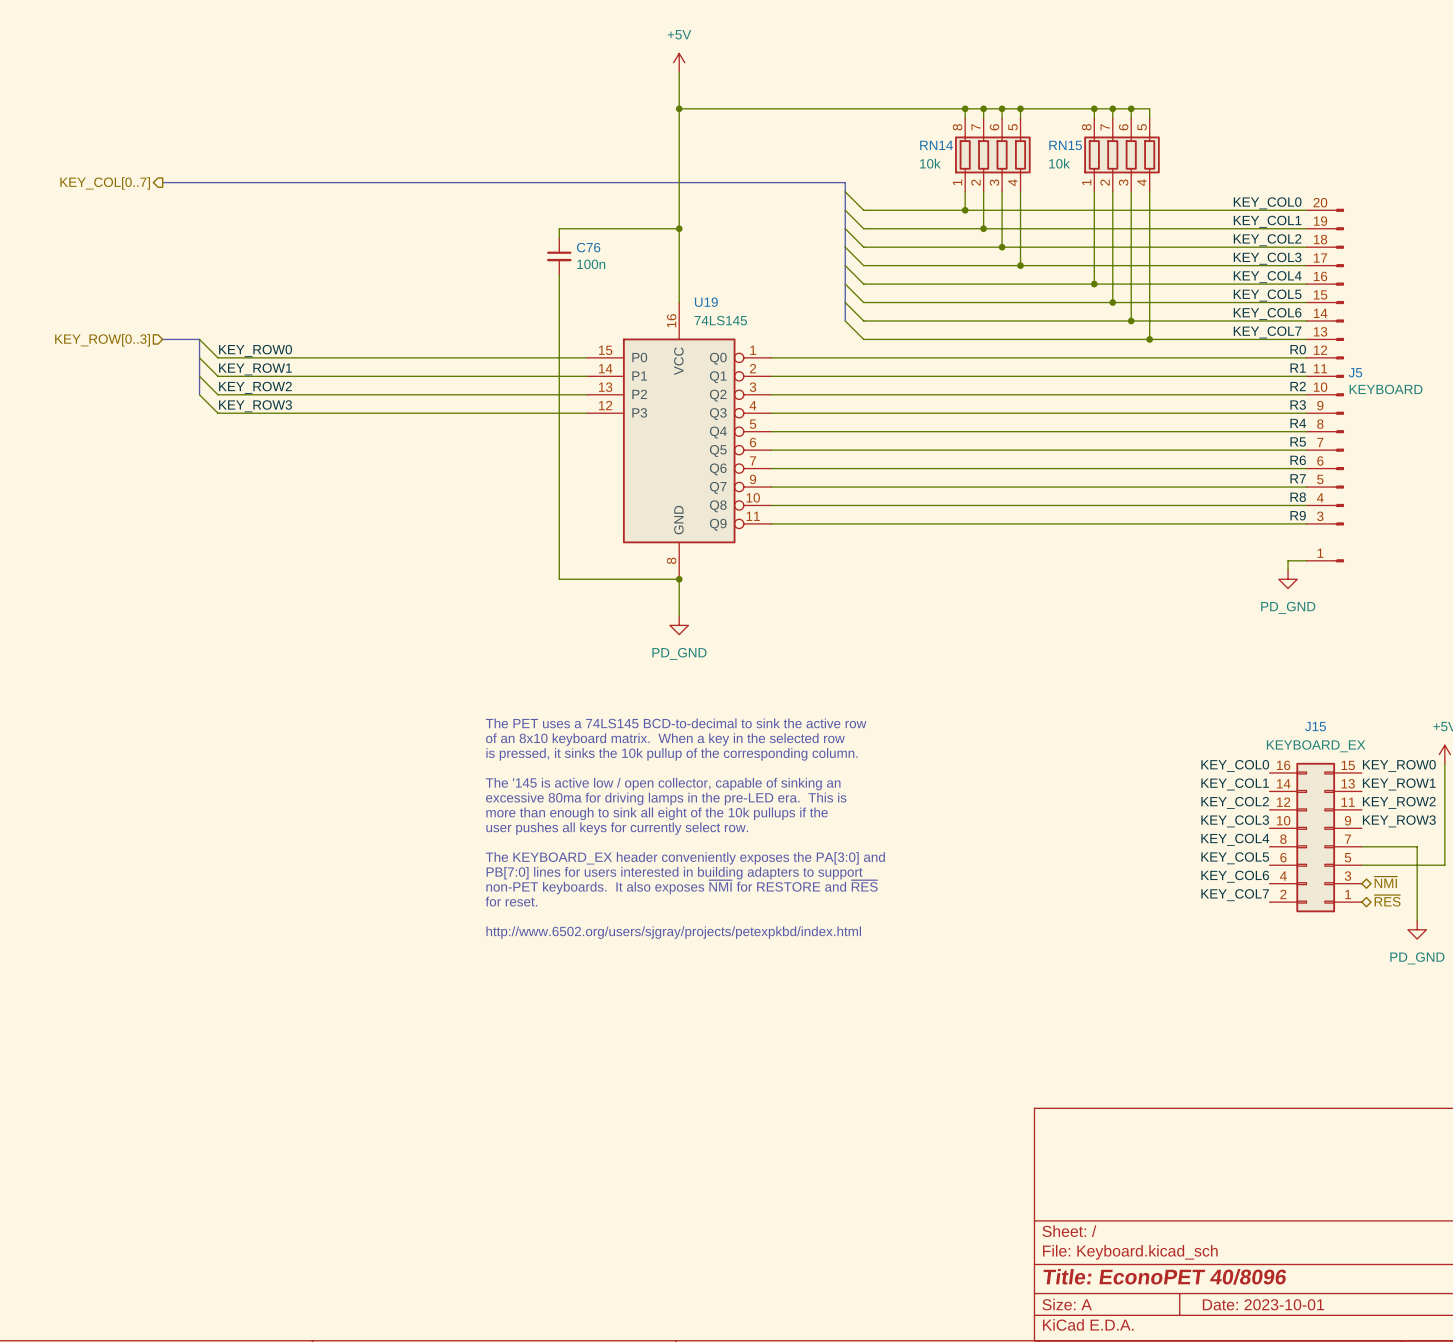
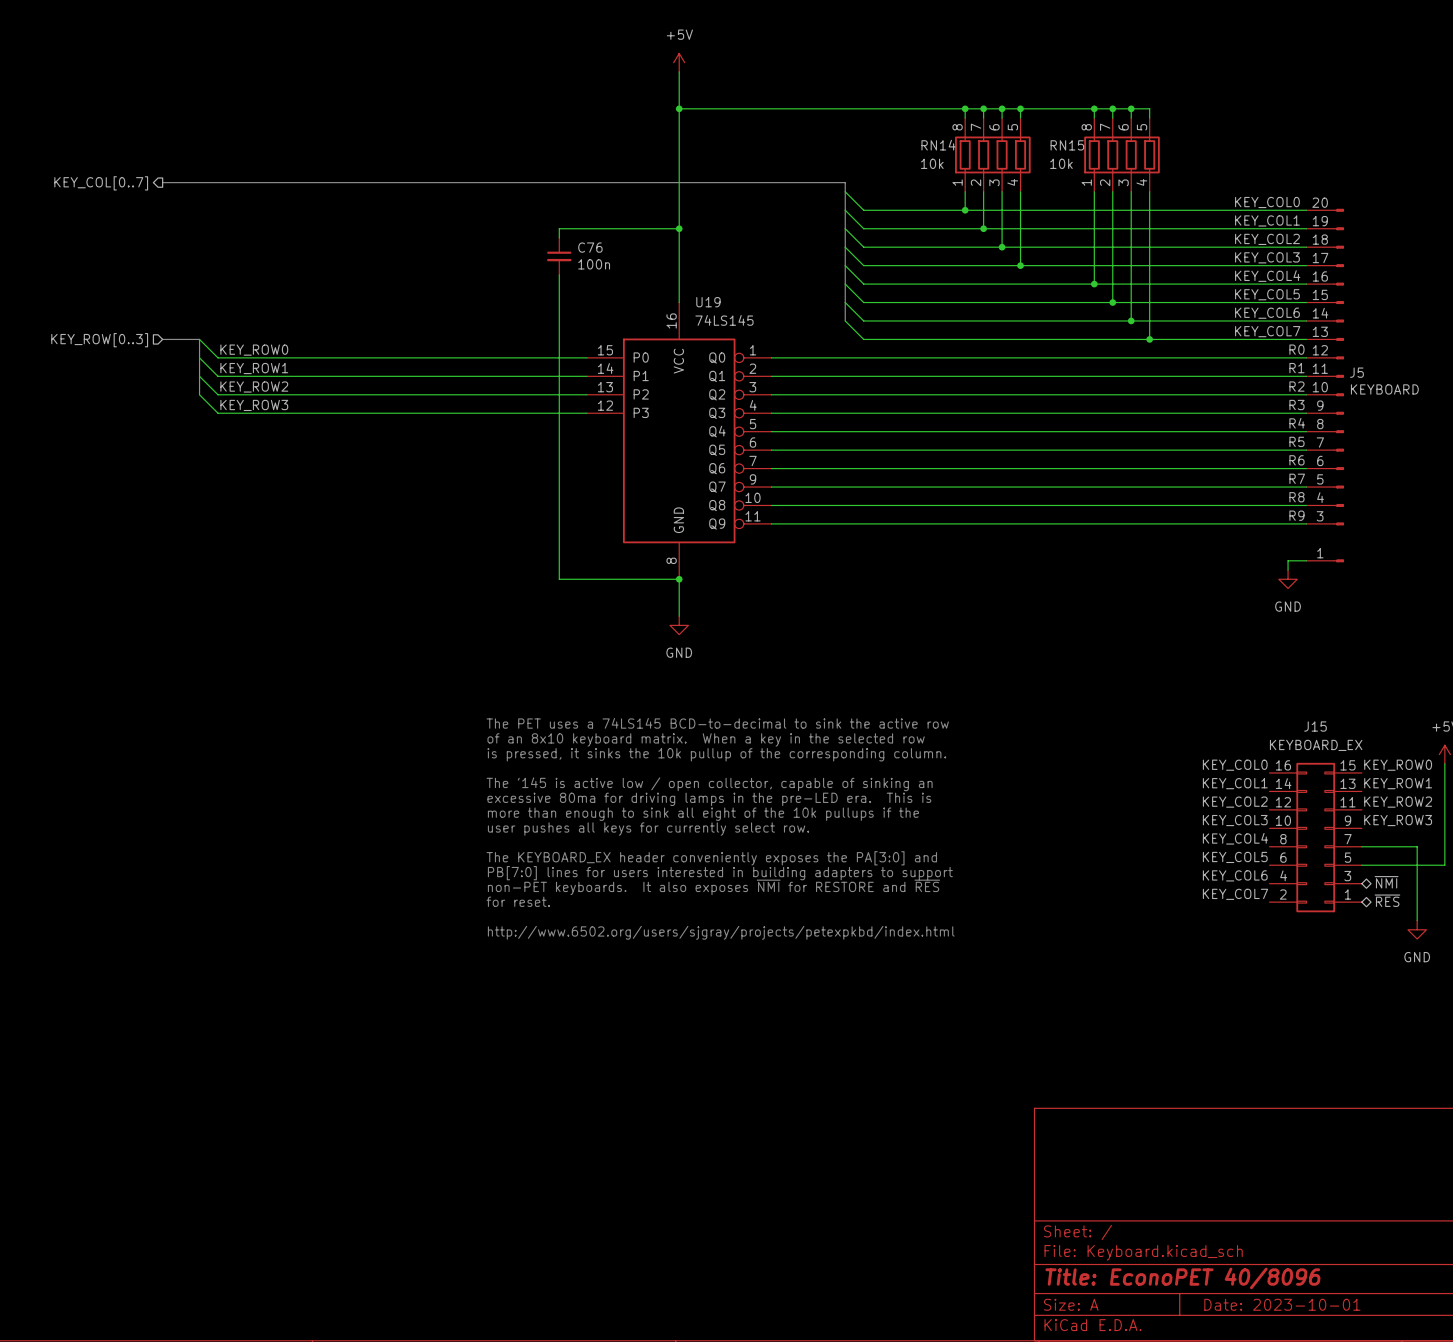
power symbol: PD_GND (1288, 579) -> GND (1288, 579)
power symbol: PD_GND (679, 625) -> GND (679, 625)
power symbol: PD_GND (1417, 929) -> GND (1417, 929)

